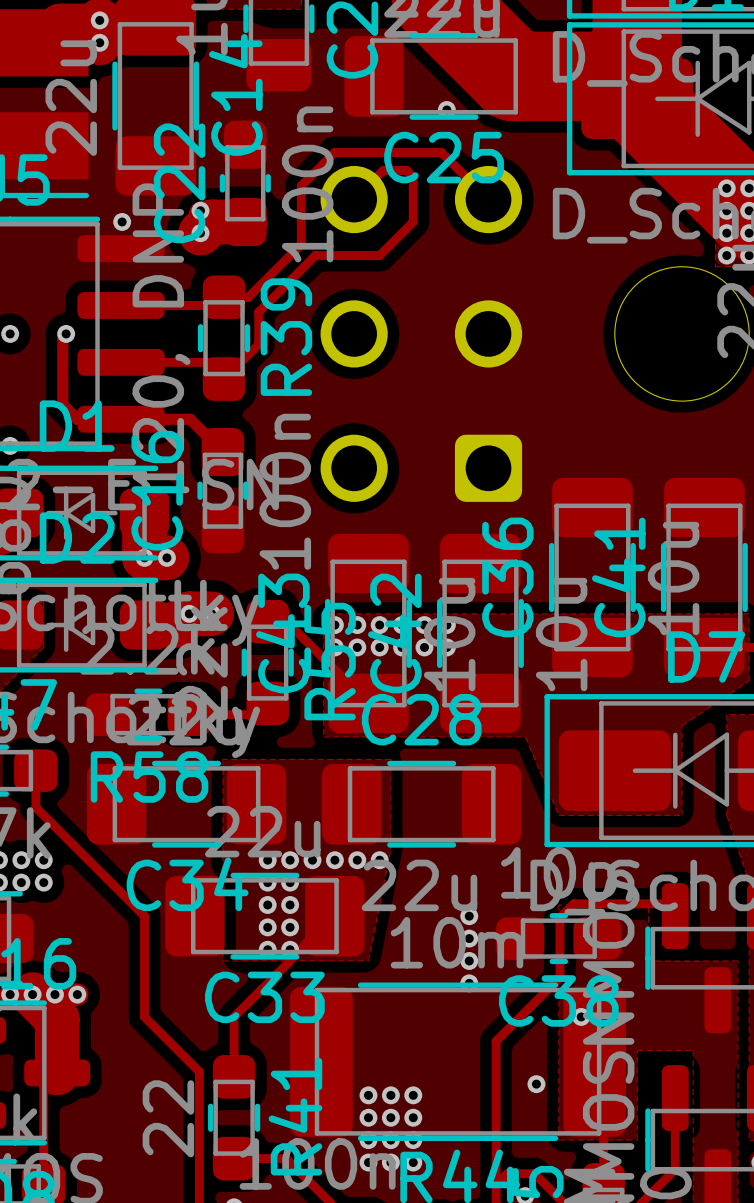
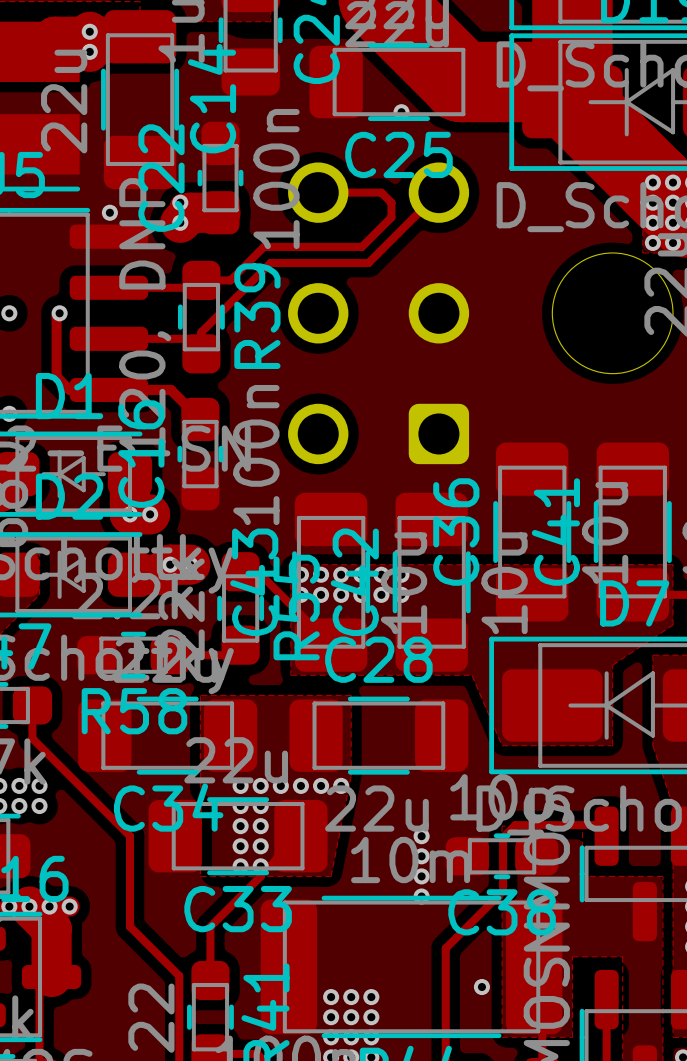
track: (354, 199) (383, 170) (406, 170) (413, 177) (413, 221) (379, 255) (315, 255) (258, 312) (258, 344) (224, 379) -> (318, 192) (381, 192) (391, 202) (391, 217) (361, 246) (263, 246) (230, 280) (223, 280)
track: (488, 199) (441, 152) (334, 152) (301, 185) (301, 244) (248, 297) -> (438, 192) (368, 263) (270, 263) (201, 332) (201, 353)
via: (581, 1016) -> none

